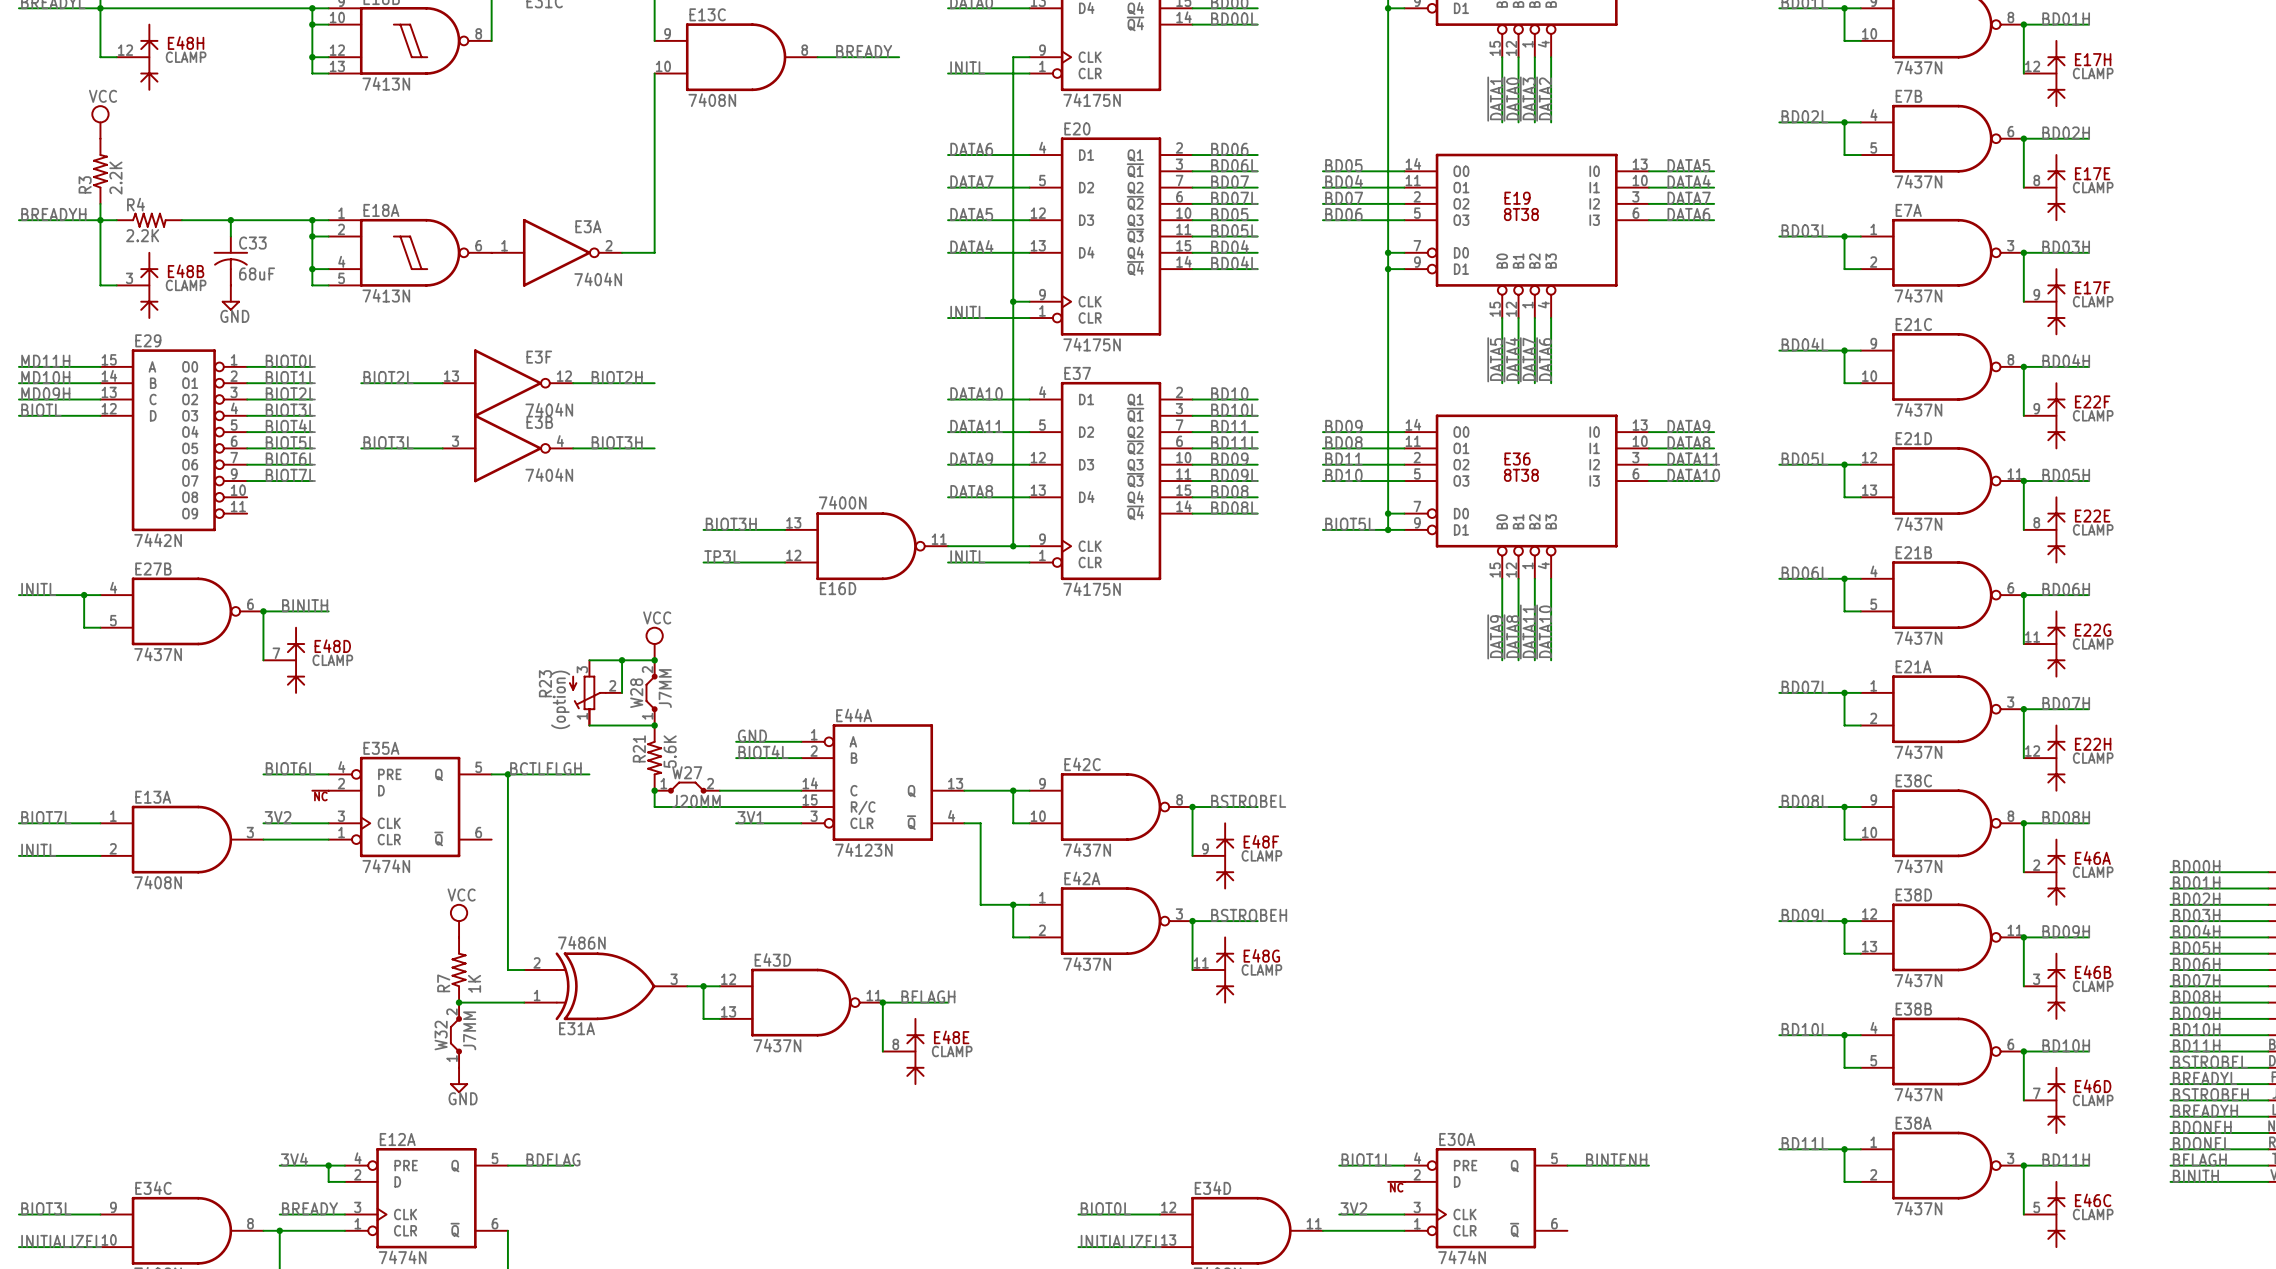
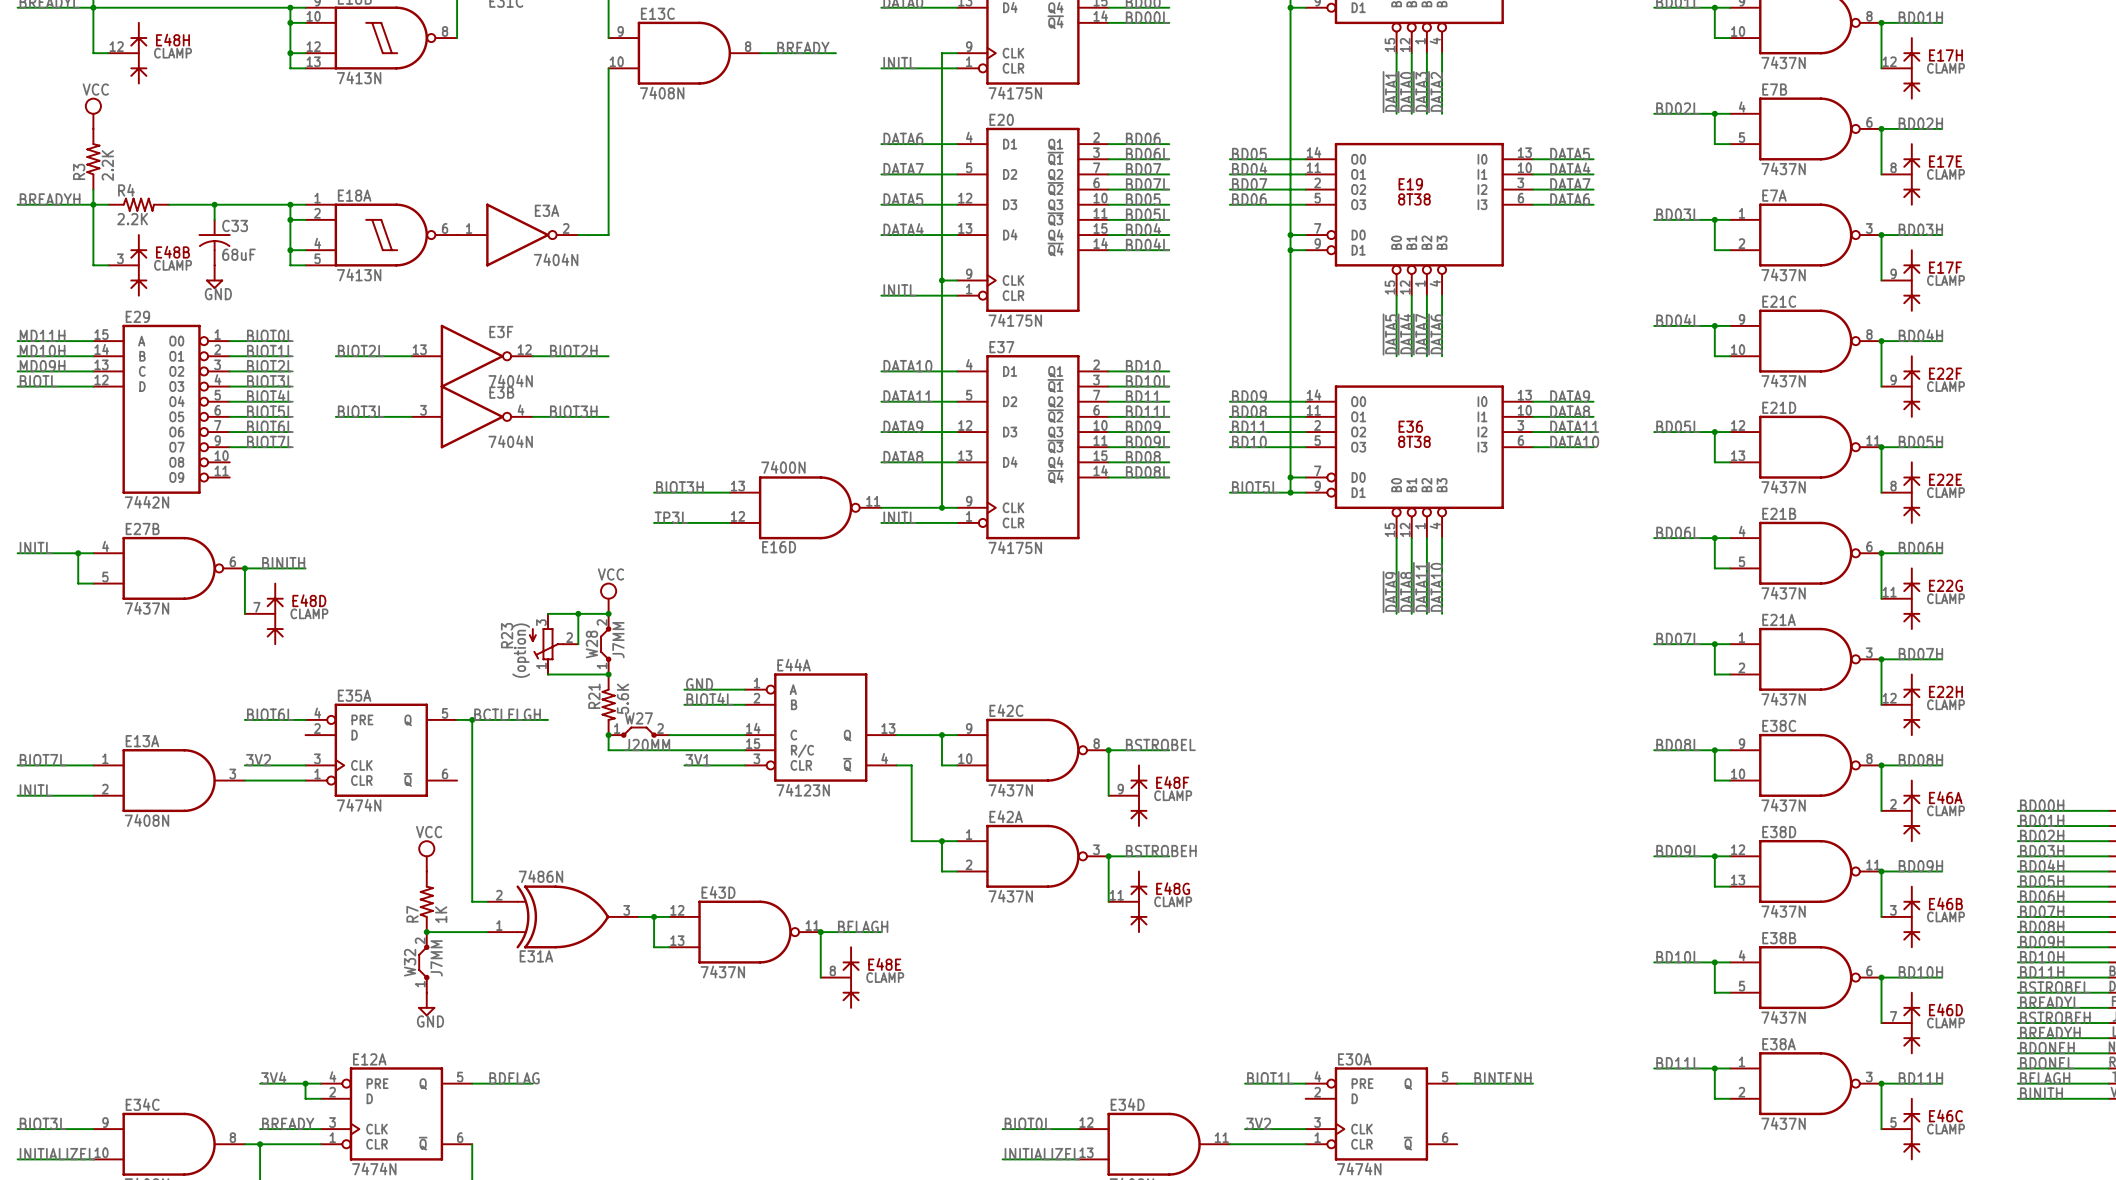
power symbol: (320, 790) -> none
power symbol: (1396, 1181) -> none

